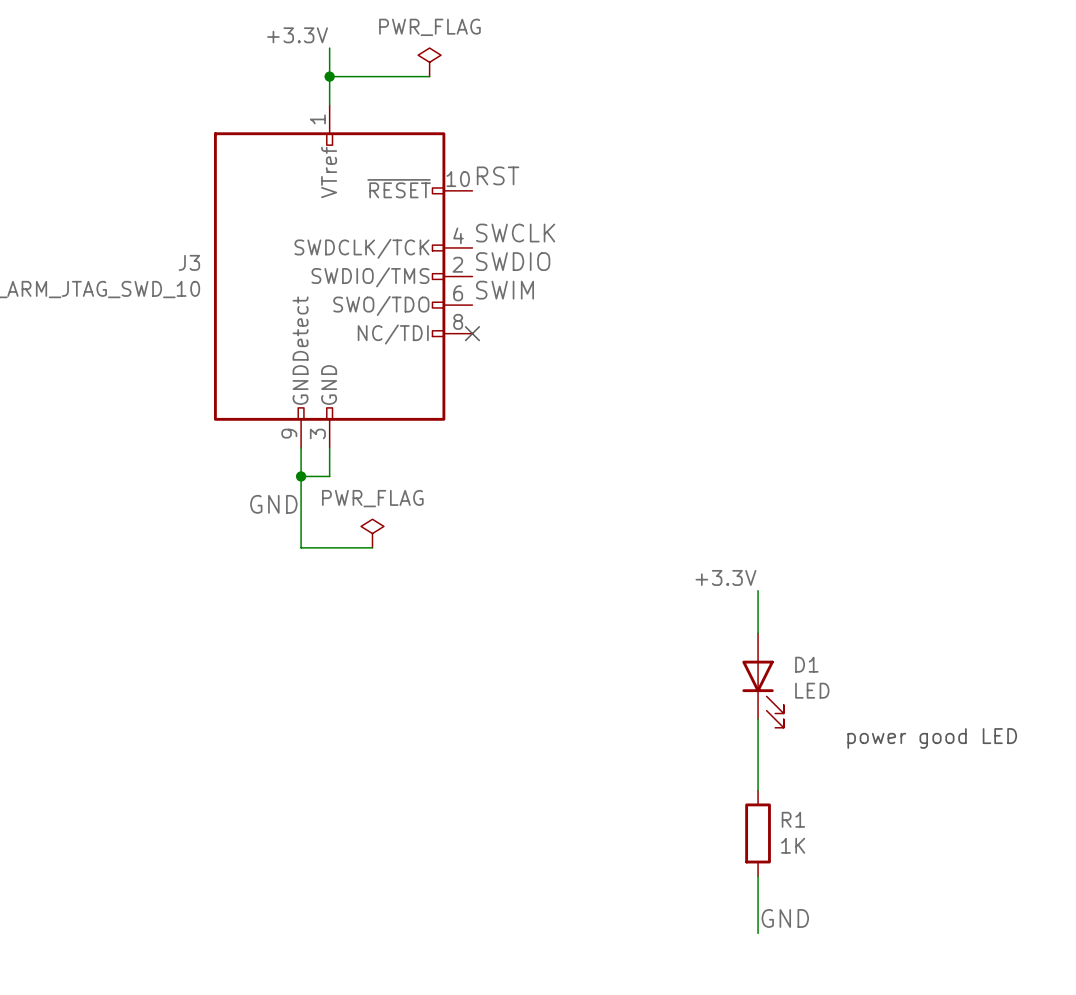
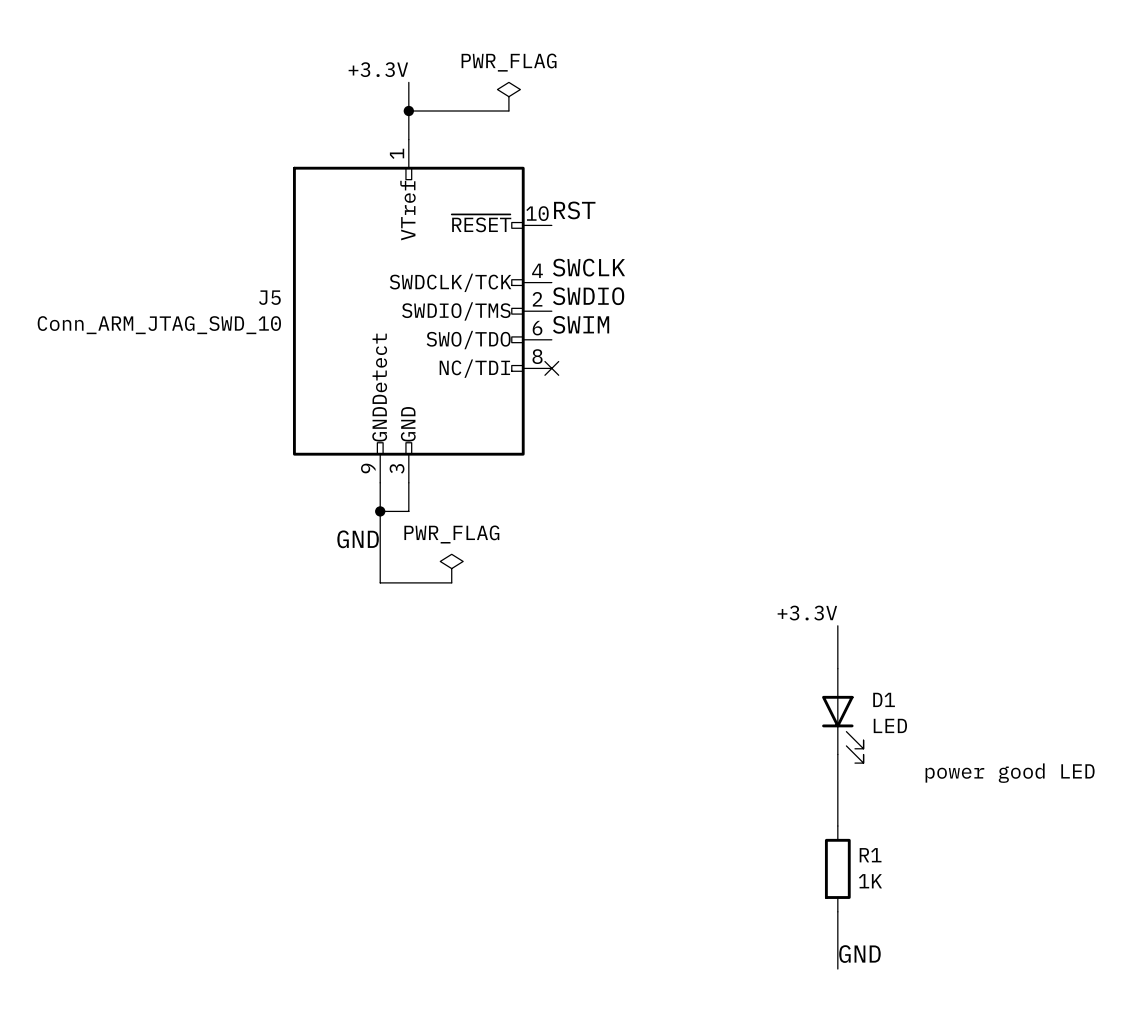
J3 name: J3 (189, 262) -> J5 (269, 297)

